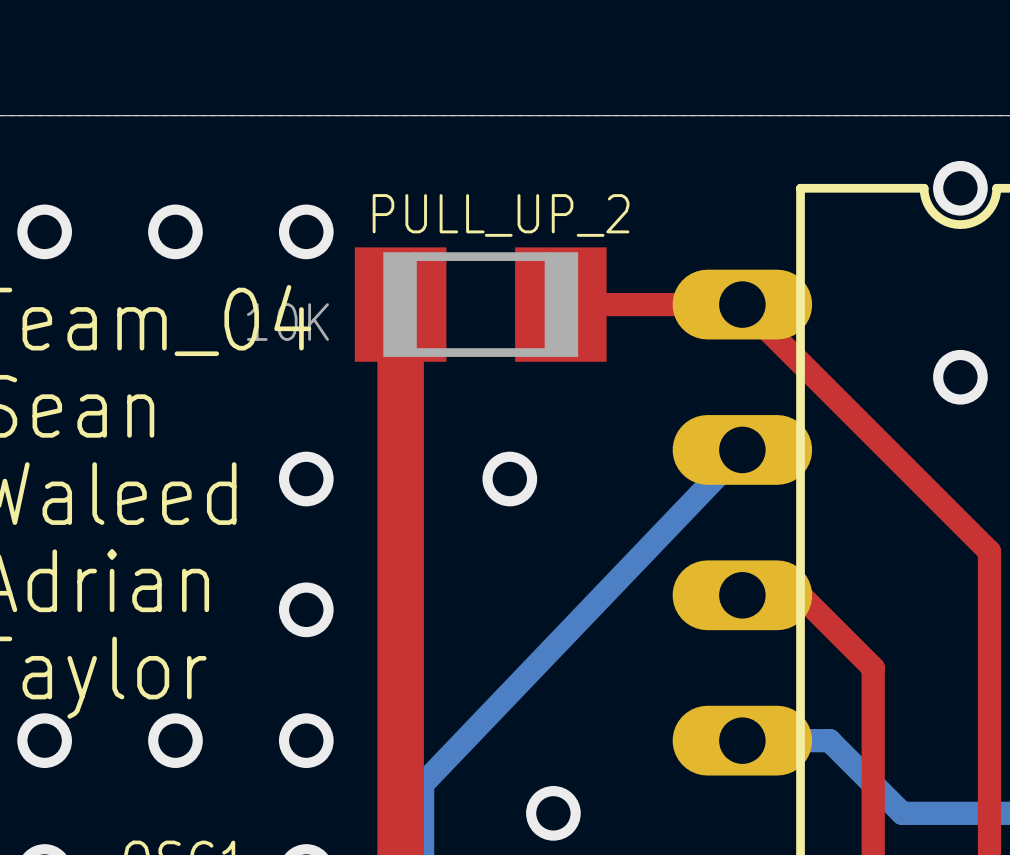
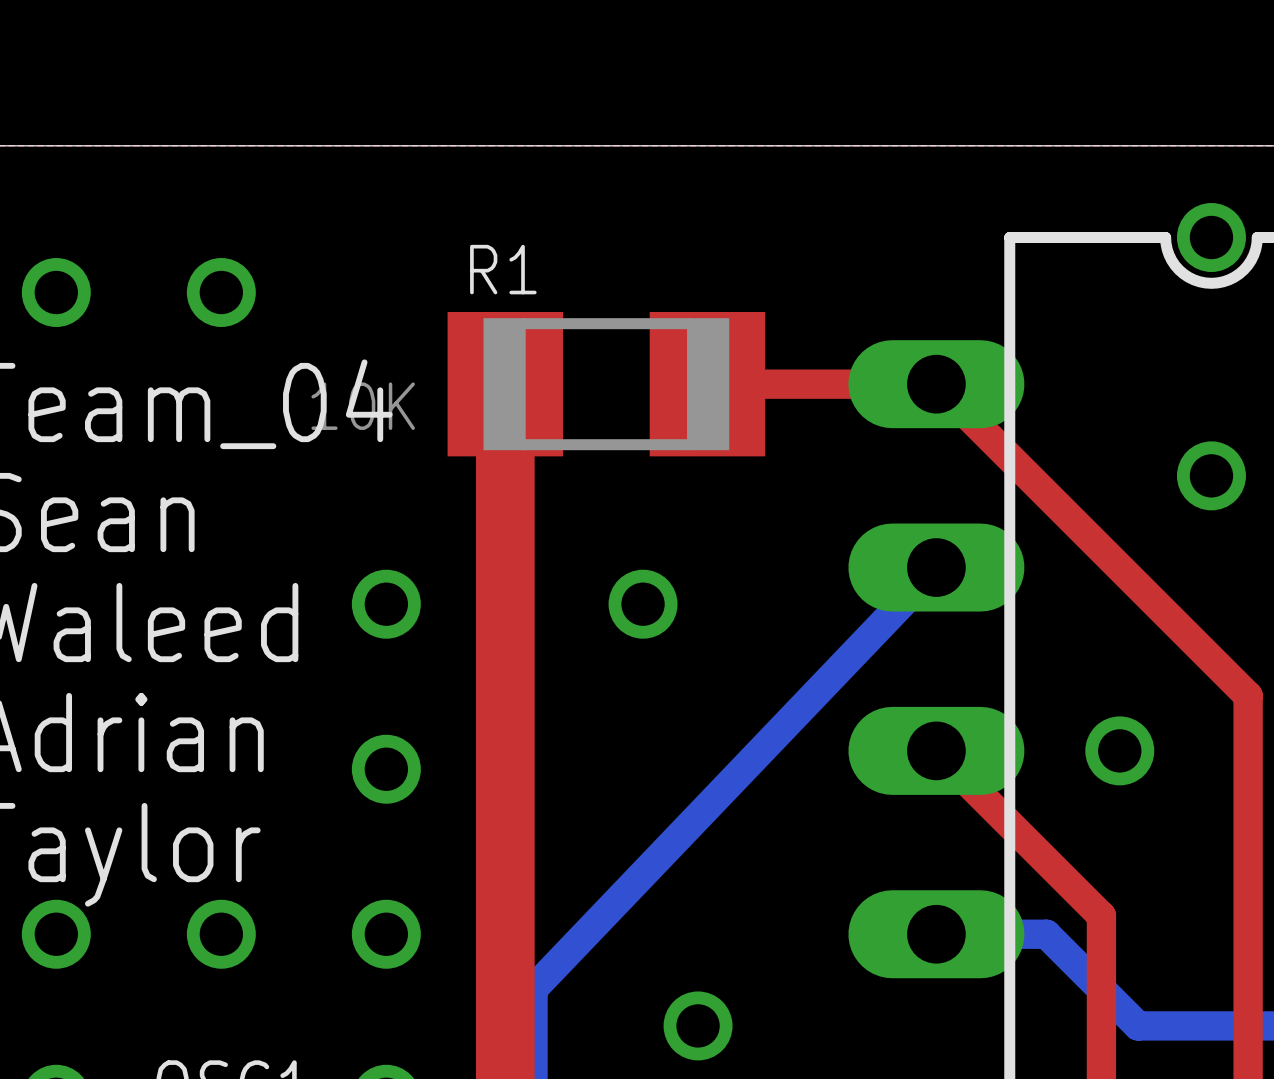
PULL_UP_2 name: PULL_UP_2 (501, 215) -> R1 (503, 269)
via: (306, 231) -> none
top track: (742, 595) (800, 595) (873, 667) (873, 726) -> (936, 750) (1101, 915)
via: none -> (1119, 750)

